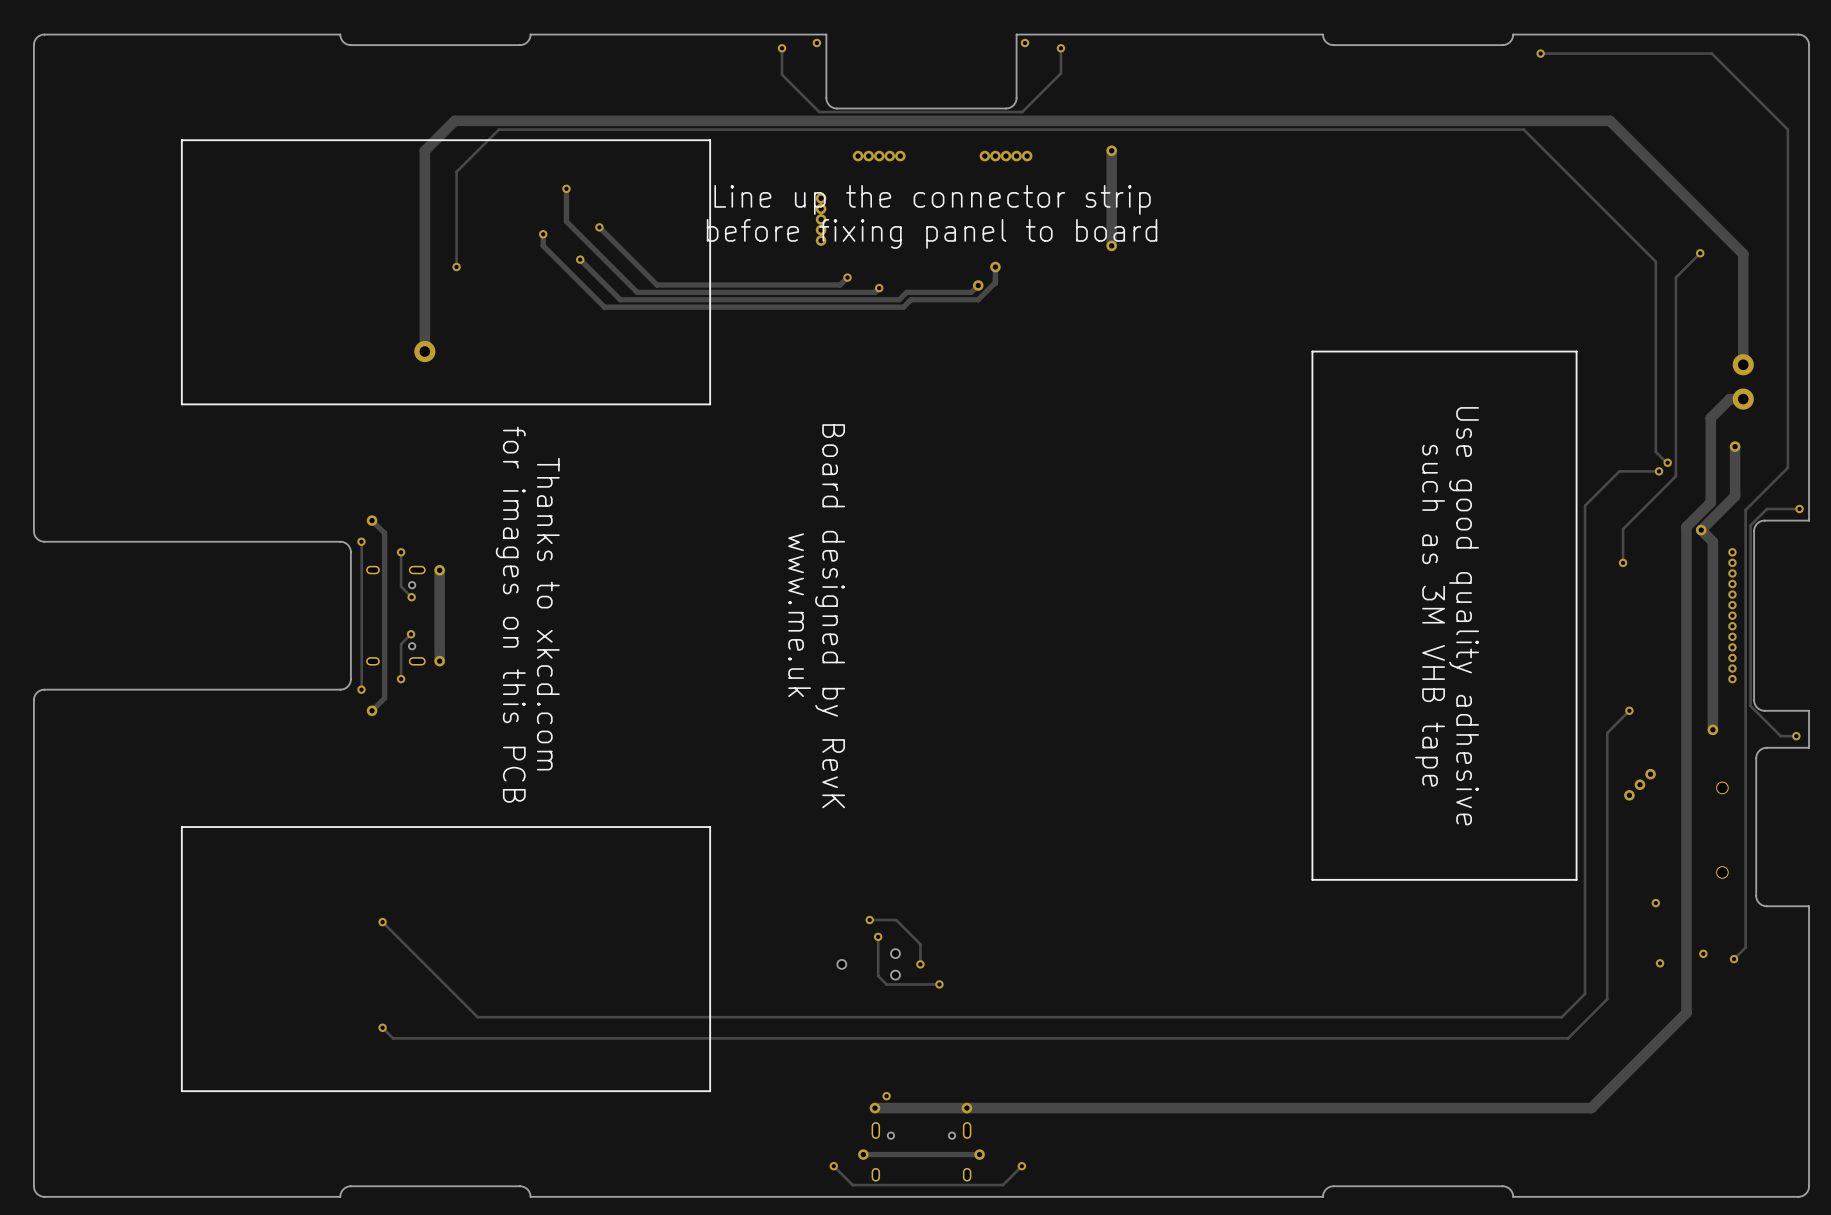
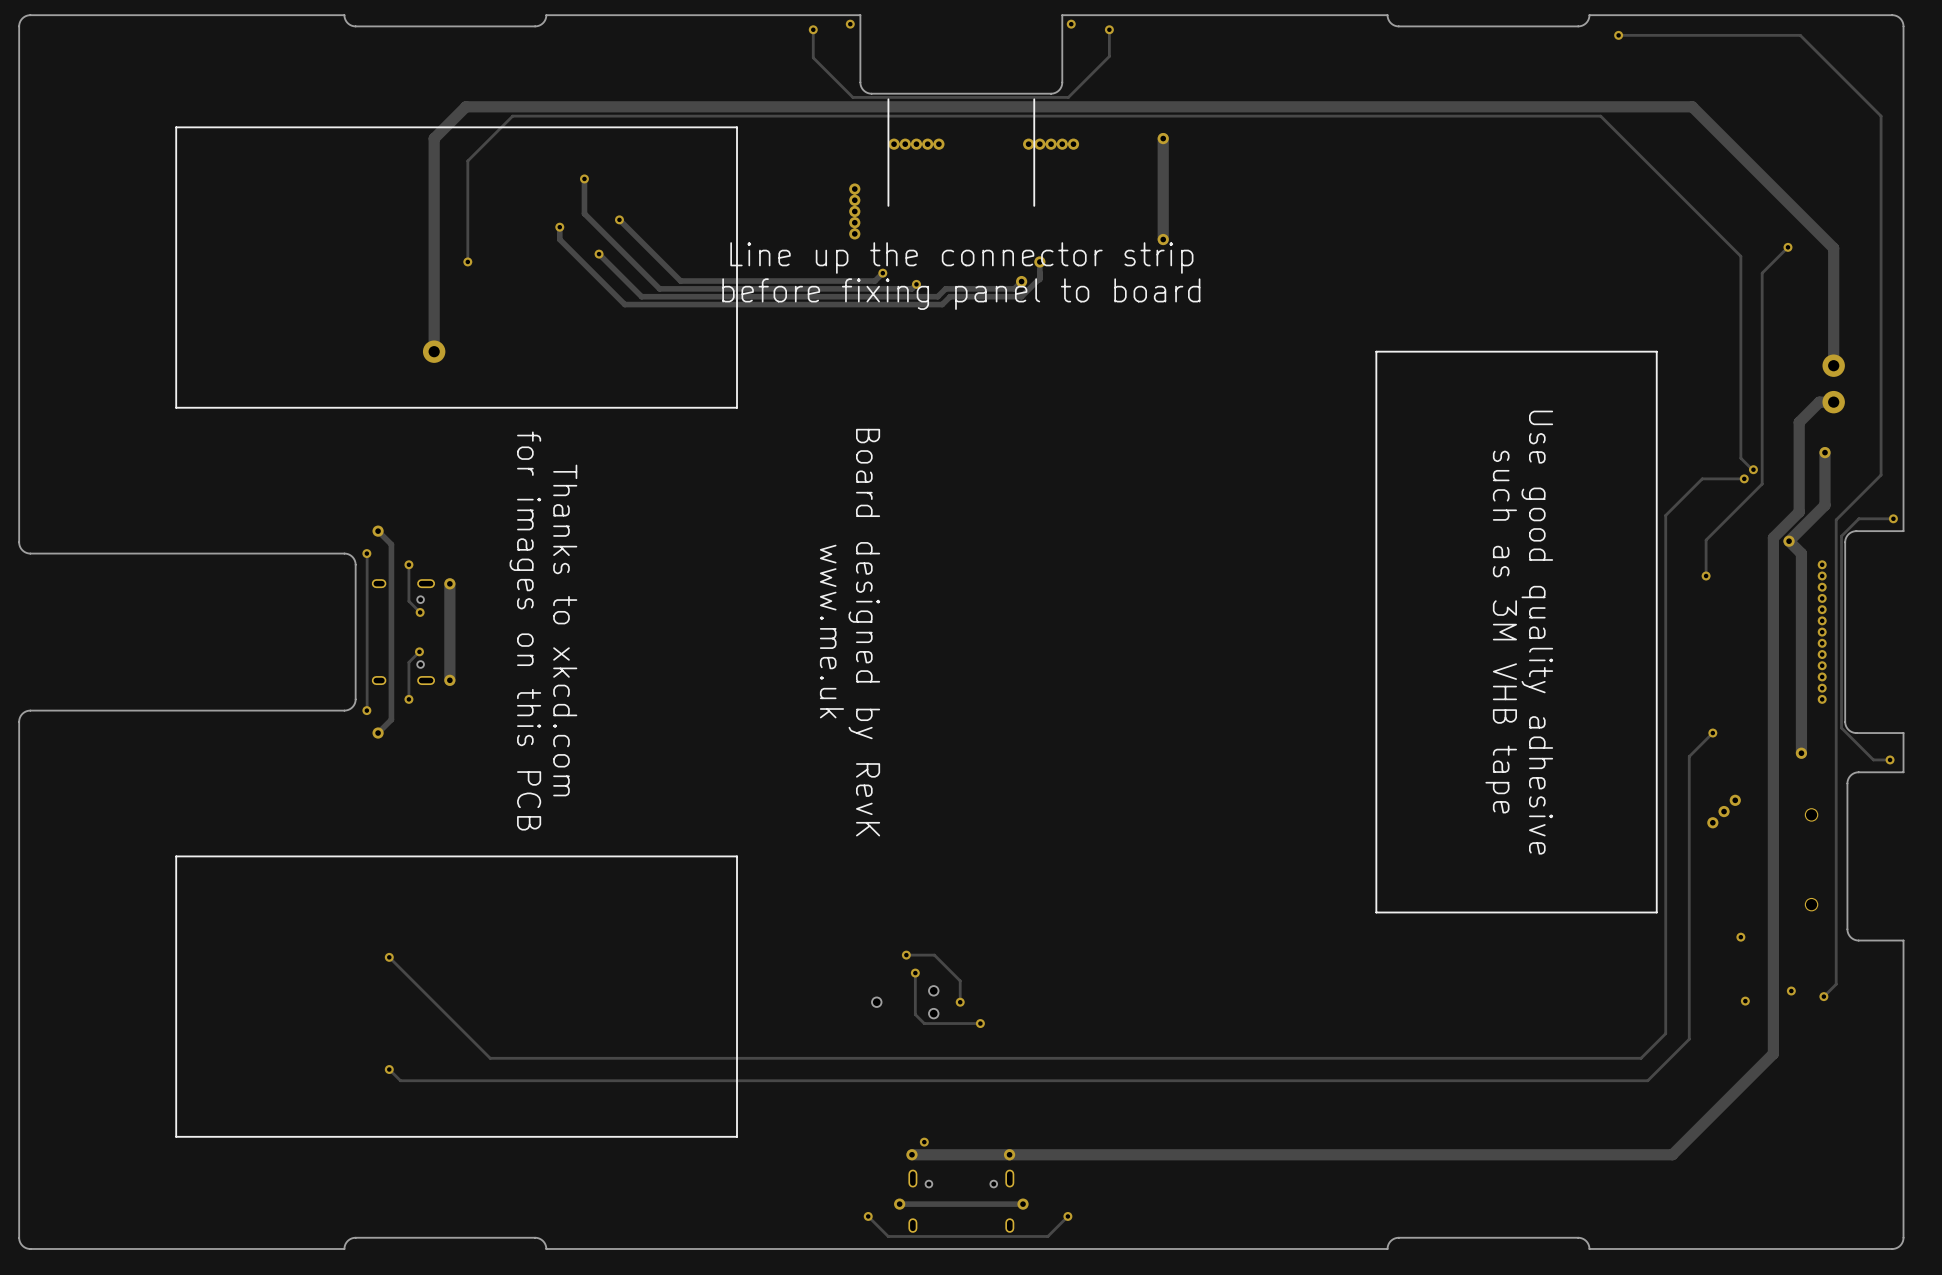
line: none -> (888, 99) (888, 205)
line: none -> (1034, 99) (1034, 205)
text position: Line up the connector strip (932, 199) -> Line up the connector strip (961, 258)
text position: before fixing panel to board (932, 233) -> before fixing panel to board (961, 294)

